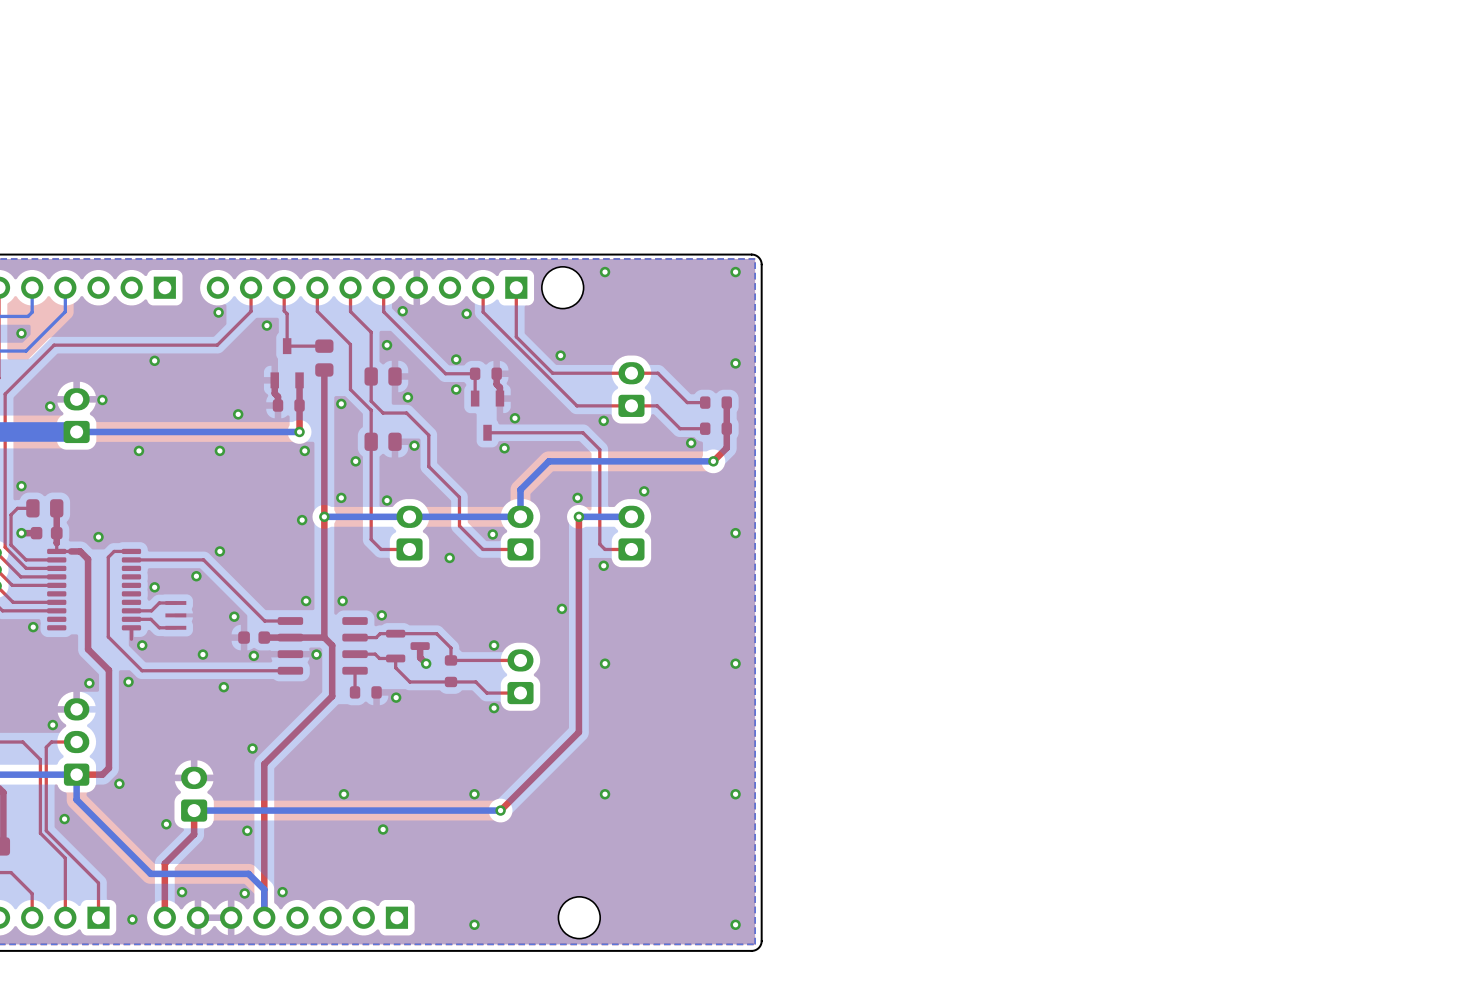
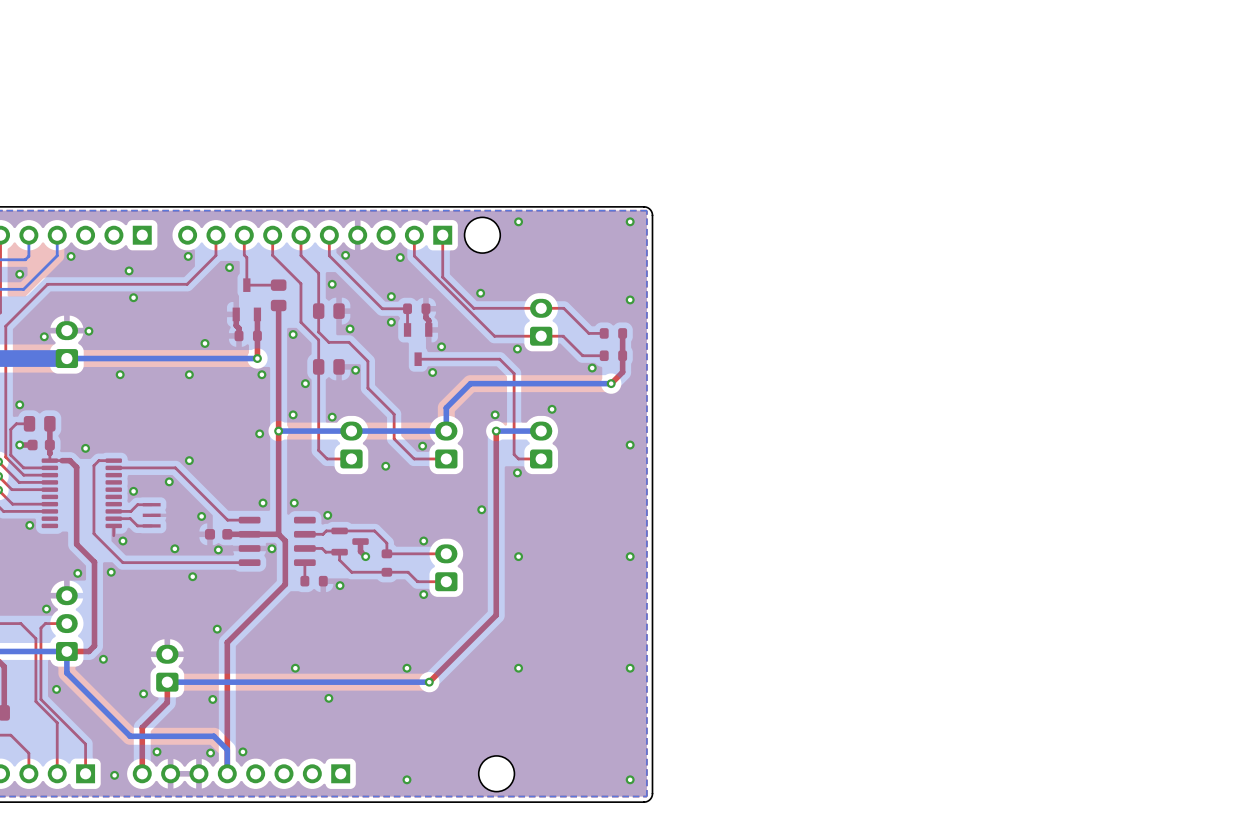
via: none -> (71, 256)
via: none -> (129, 270)

